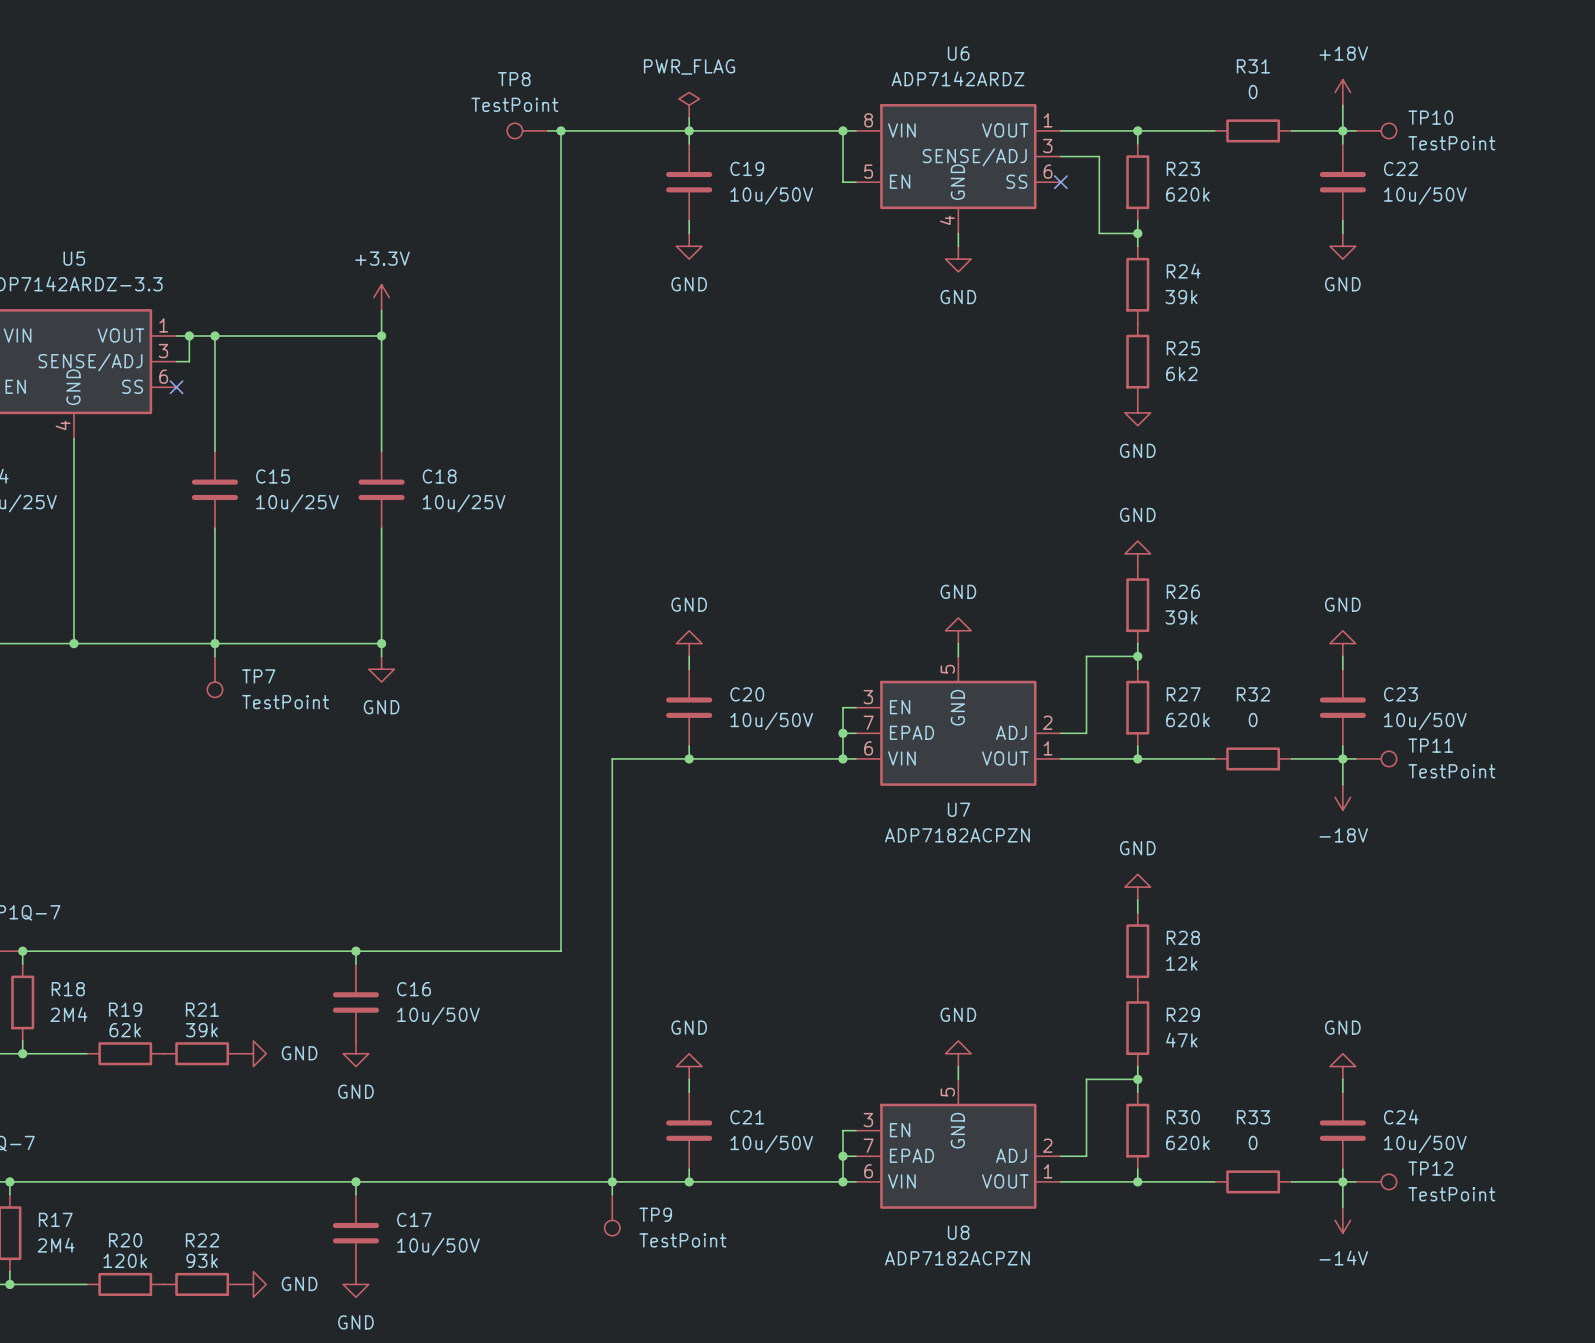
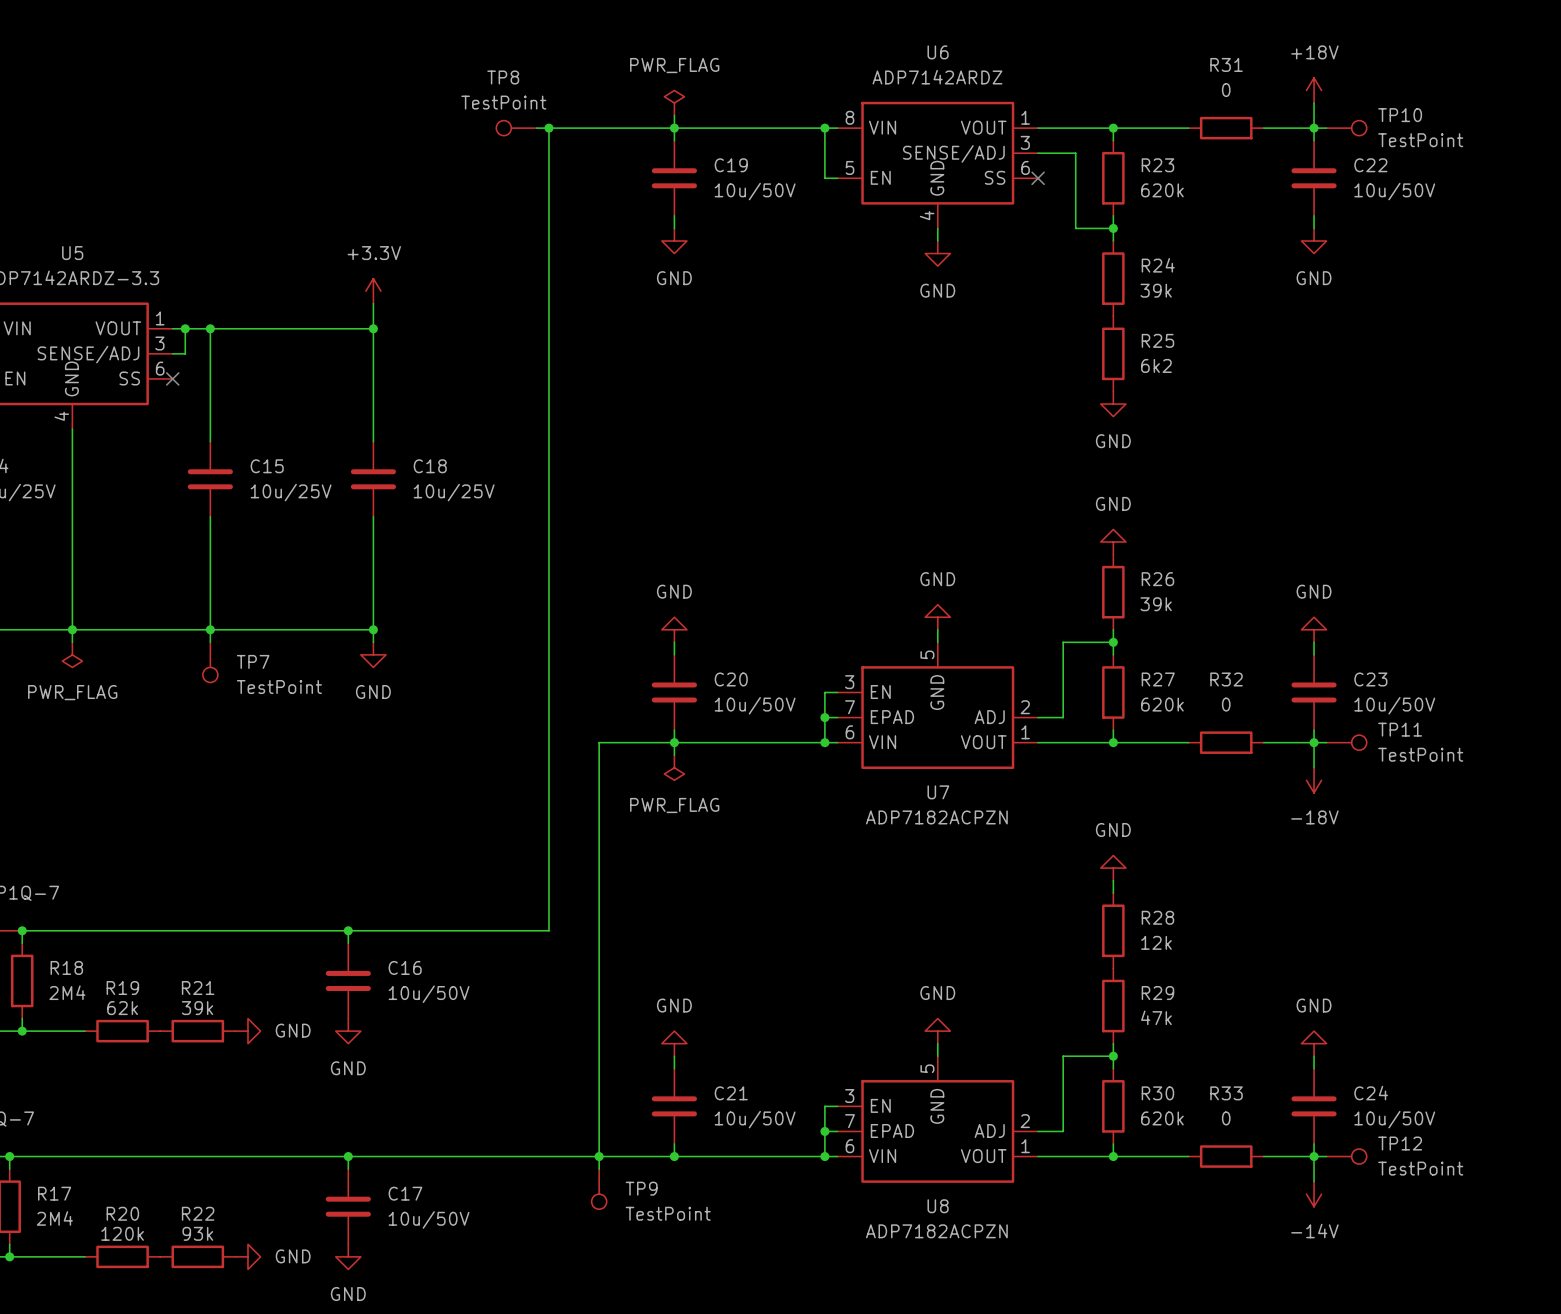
wire: none -> (72, 629) (72, 642)
power symbol: none -> PWR_FLAG (72, 654)
wire: none -> (674, 742) (674, 755)
power symbol: none -> PWR_FLAG (674, 767)

